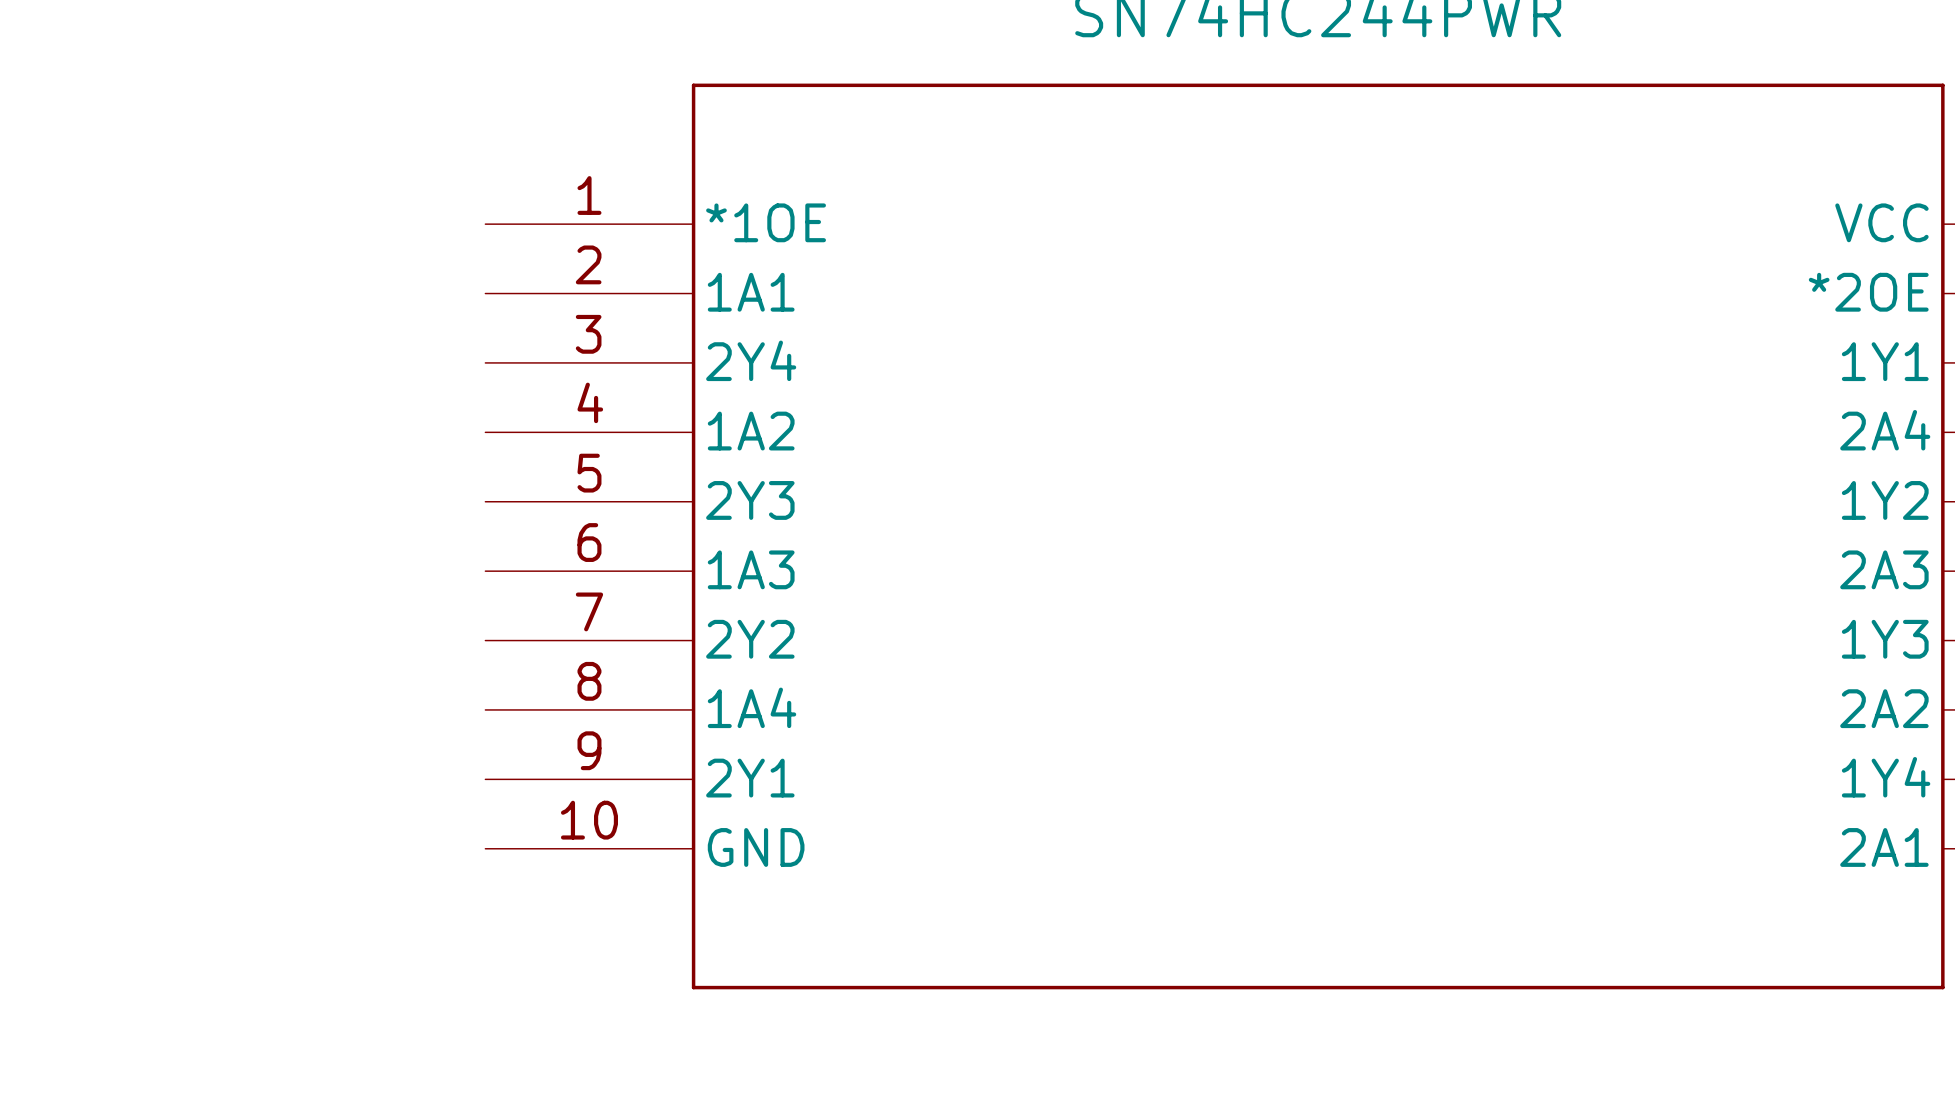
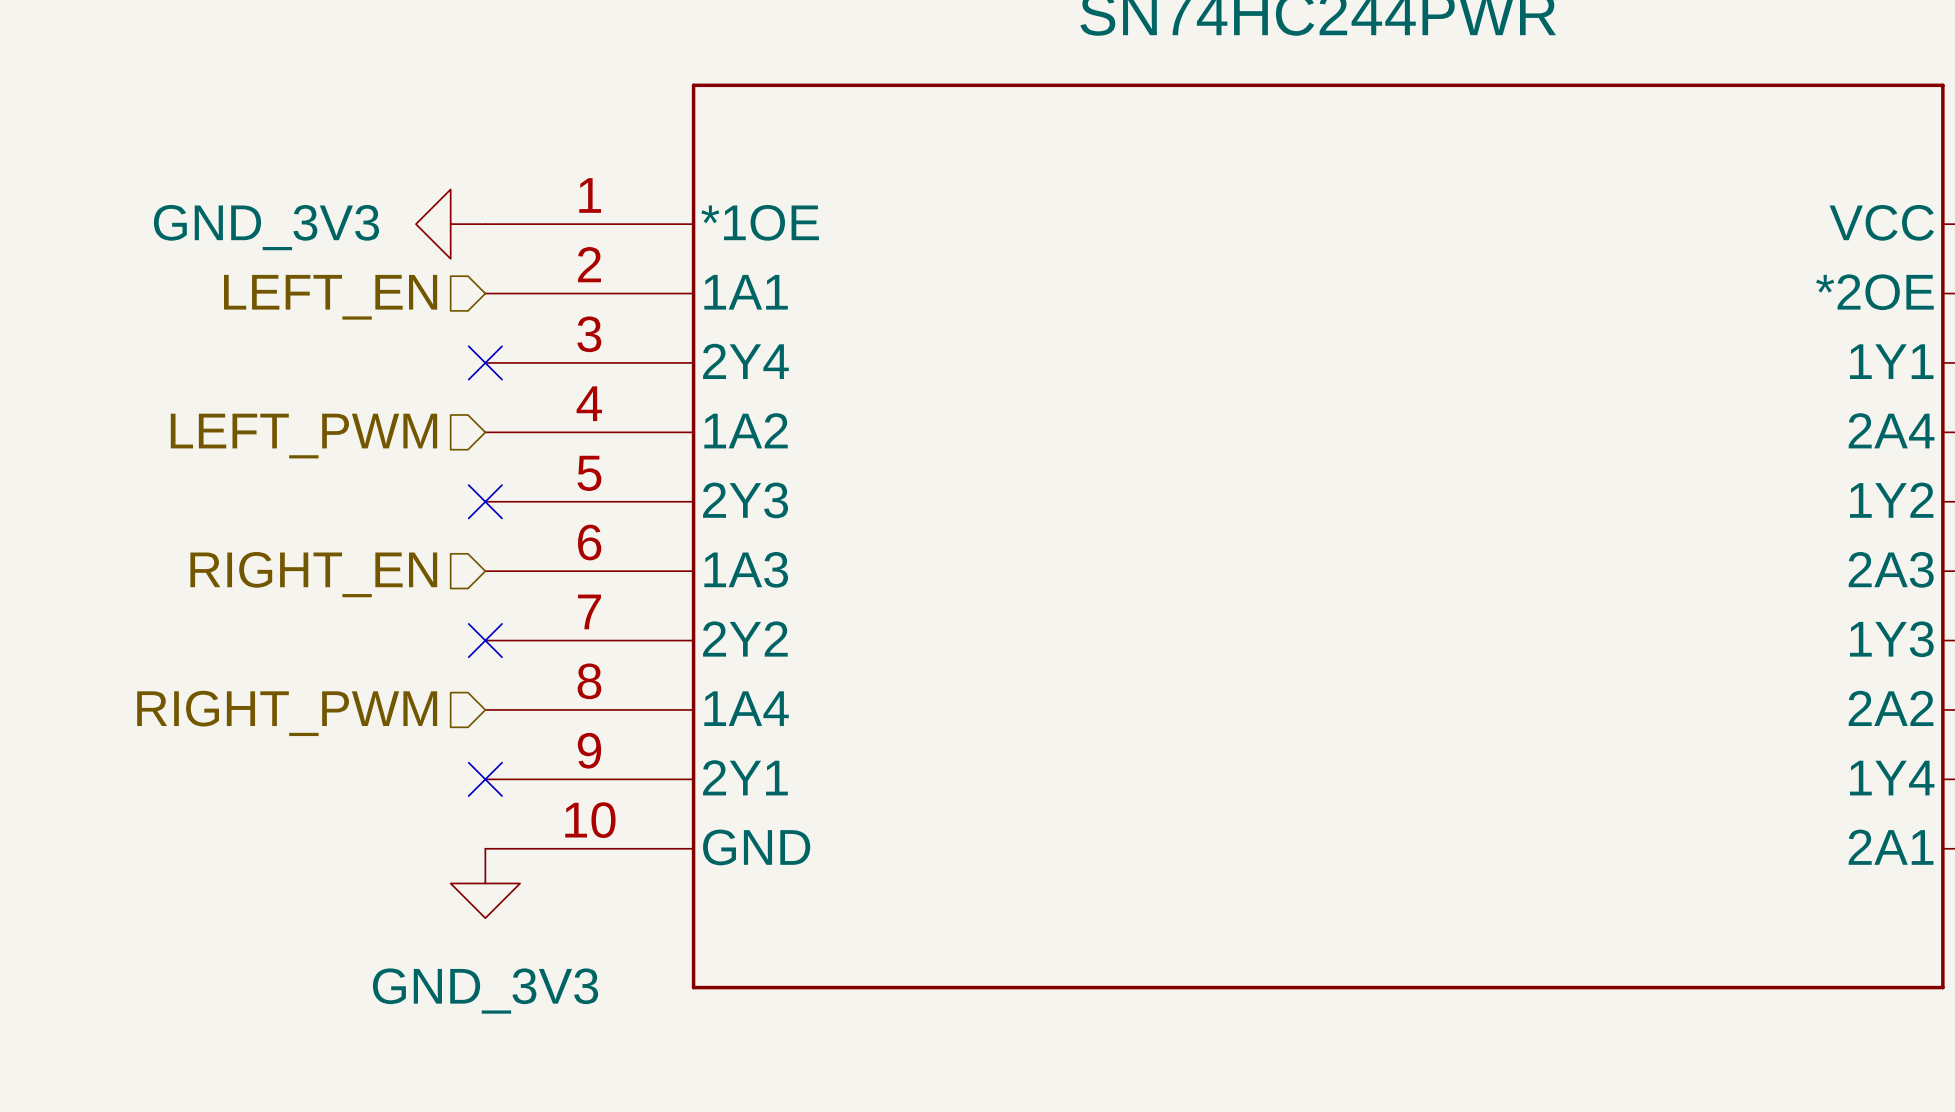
power symbol: none -> GND_3V3 (450, 224)
hierarchical label: none -> LEFT_EN (330, 297)
no-connect mark: none -> (485, 362)
hierarchical label: none -> LEFT_PWM (303, 436)
no-connect mark: none -> (485, 501)
hierarchical label: none -> RIGHT_EN (313, 574)
no-connect mark: none -> (485, 640)
hierarchical label: none -> RIGHT_PWM (287, 713)
no-connect mark: none -> (485, 779)
power symbol: none -> GND_3V3 (485, 883)

